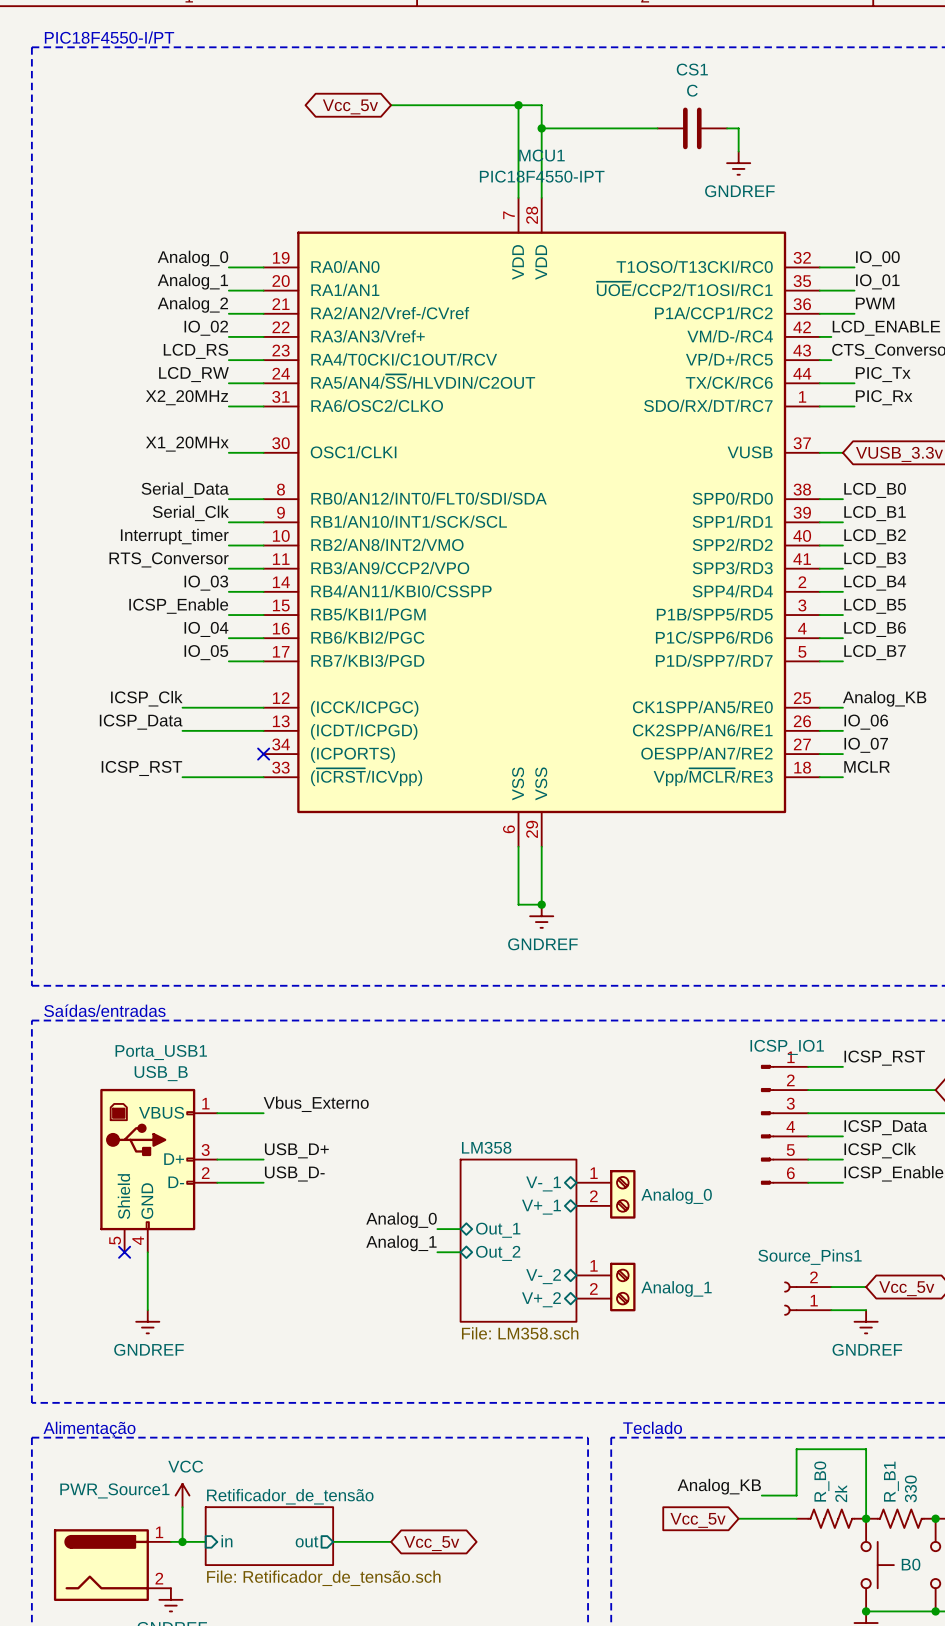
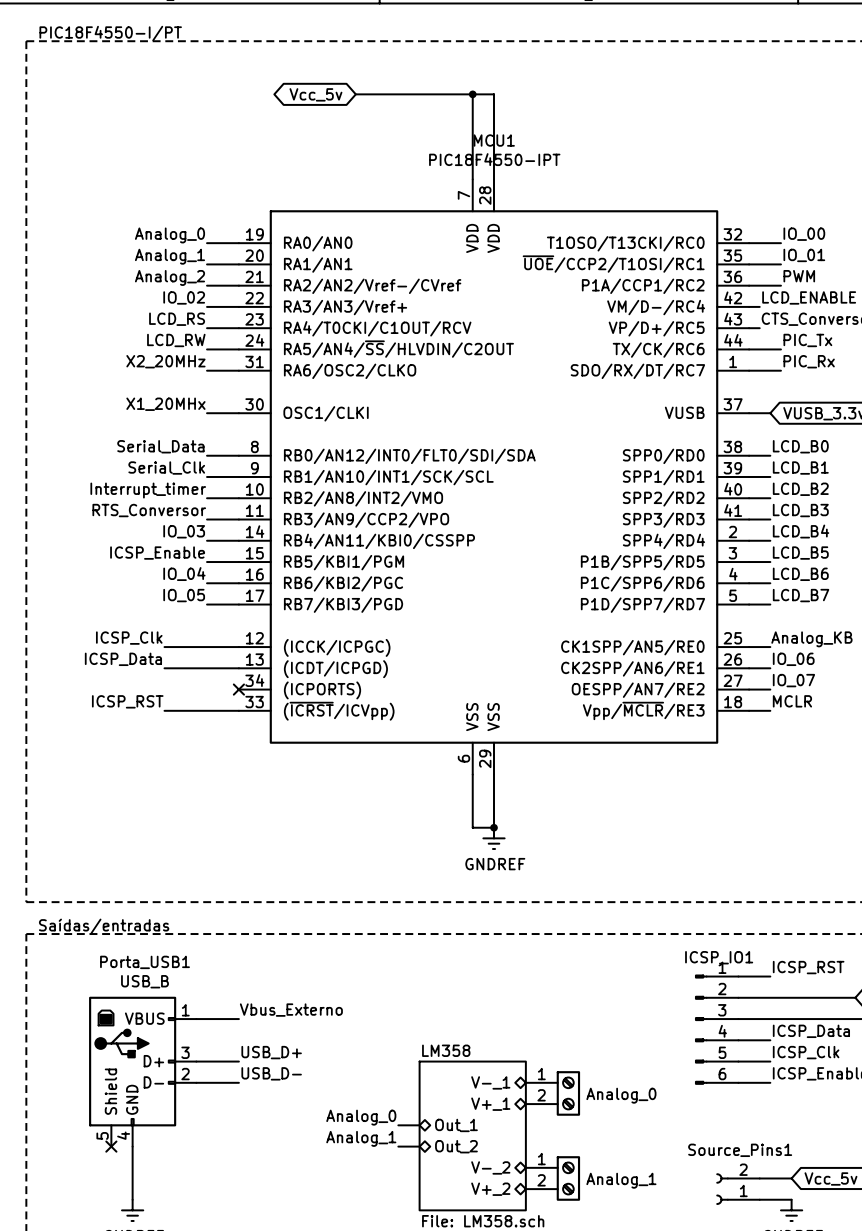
wire: (541, 128) (657, 128) -> none
junction: (541, 128) -> none
CS1: C (692, 128) -> none
wire: (727, 128) (738, 128) (738, 151) -> none
power symbol: GNDREF (738, 163) -> none

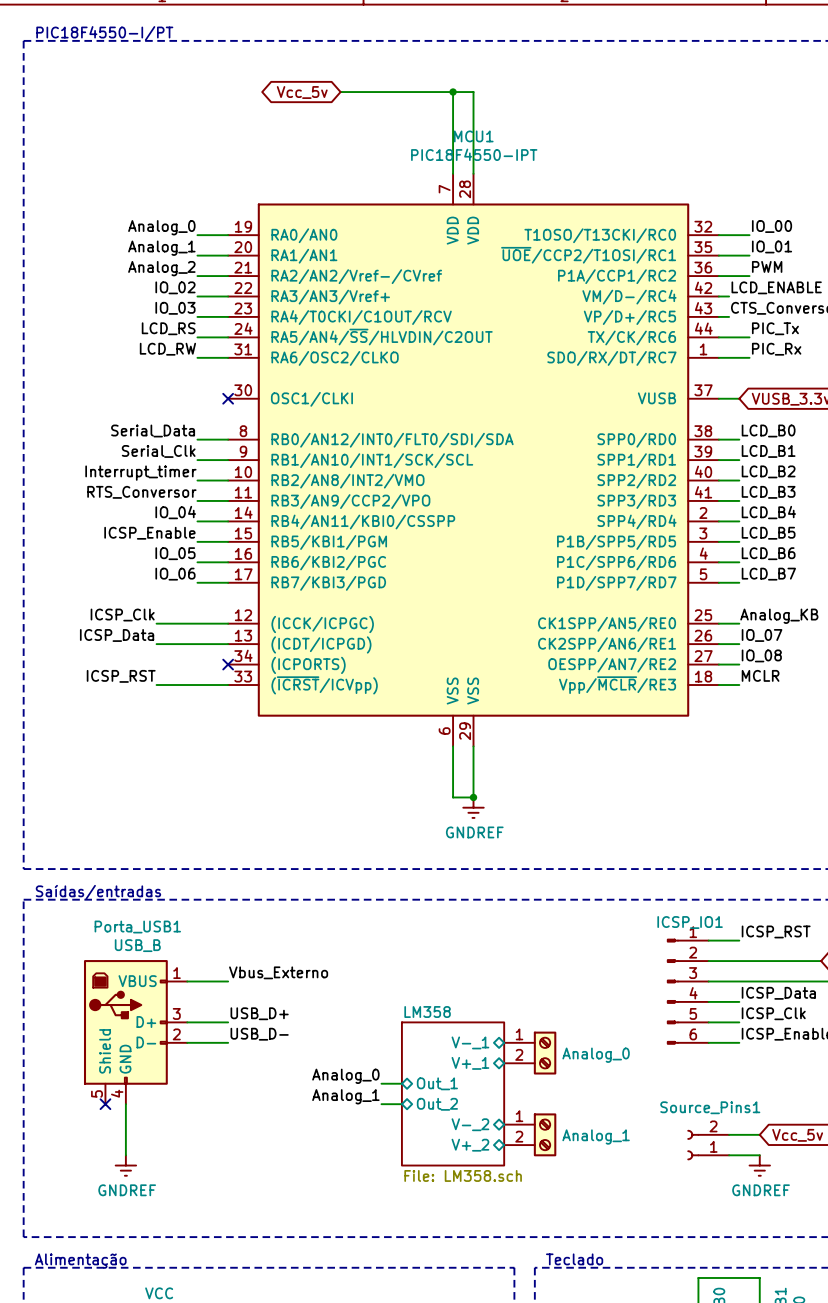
label: LCD_RS (177, 319) -> IO_03 (175, 308)
label: LCD_RW (176, 340) -> LCD_RS (168, 328)
label: X2_20MHz (165, 361) -> LCD_RW (167, 349)
label: X1_20MHx (165, 404) -> none
wire: (207, 413) (238, 413) -> none
no-connect mark: none -> (228, 398)
label: IO_03 (184, 531) -> IO_04 (175, 512)
label: IO_04 (184, 574) -> IO_05 (175, 553)
label: IO_05 (184, 595) -> IO_06 (175, 574)
label: IO_06 (793, 659) -> IO_07 (762, 635)
label: IO_07 (793, 680) -> IO_08 (761, 655)

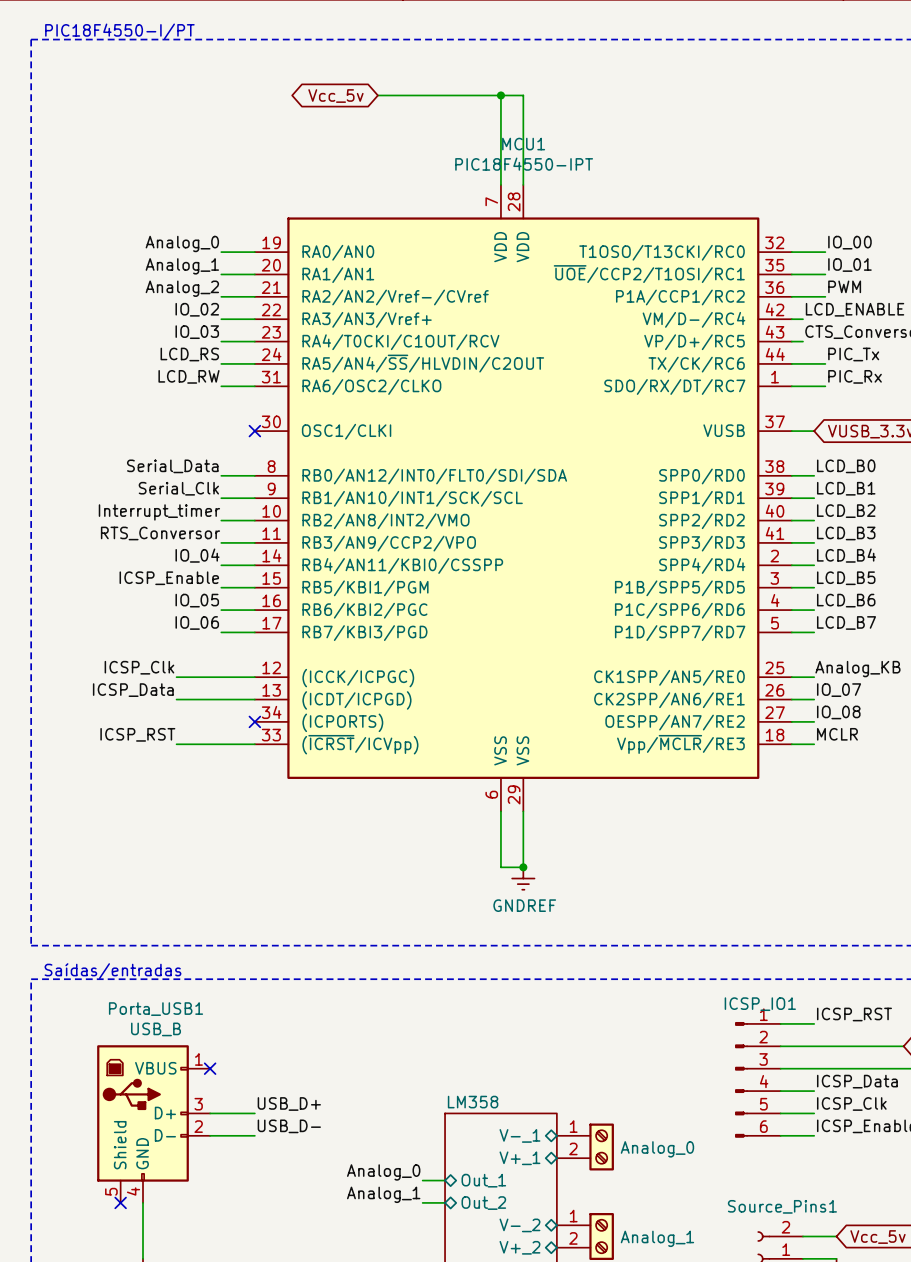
label: Vbus_Externo (278, 972) -> none
wire: (187, 981) (228, 981) -> none
no-connect mark: none -> (210, 1068)

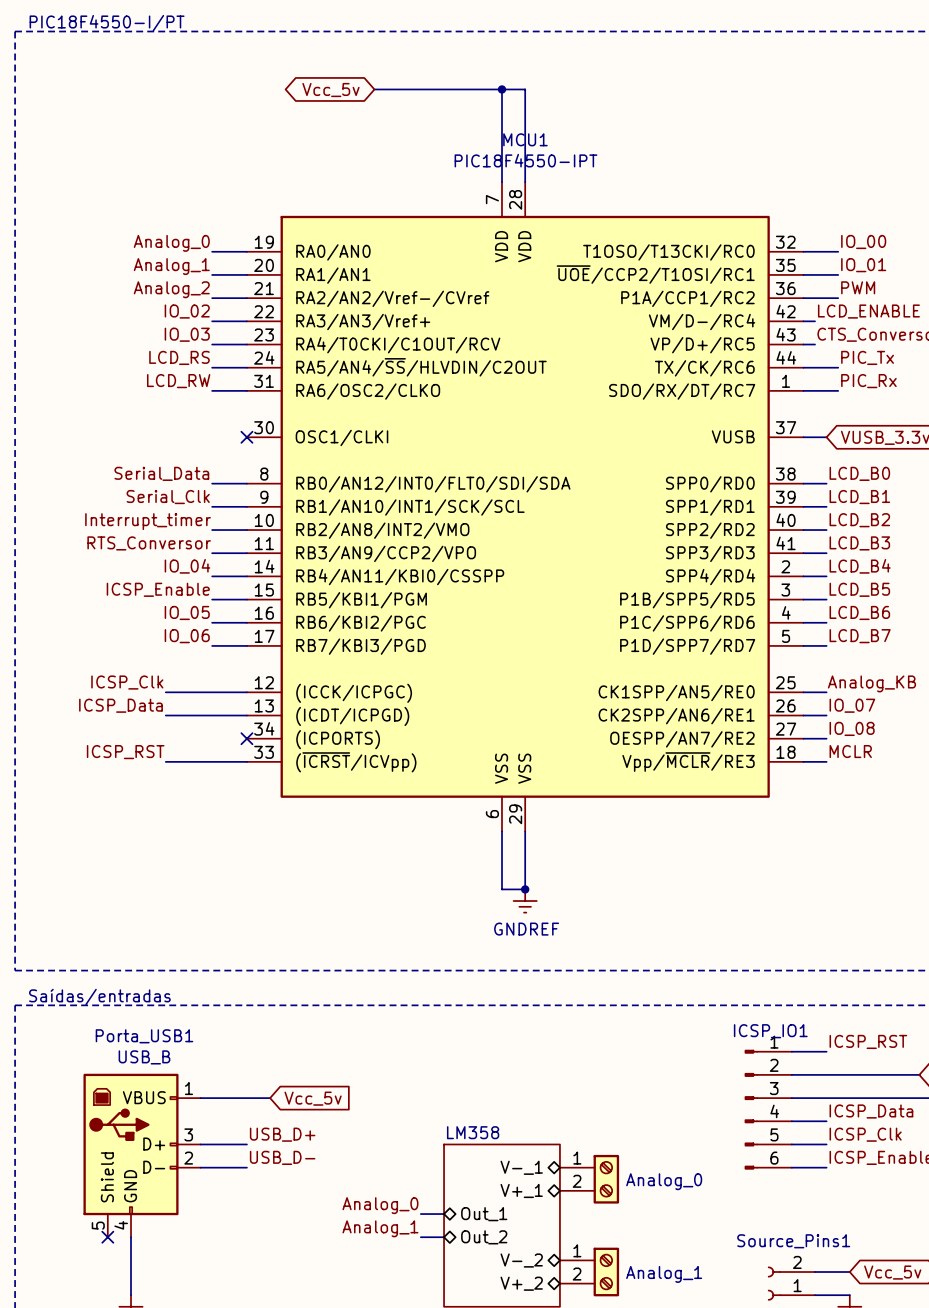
wire: none -> (200, 1098) (270, 1098)
no-connect mark: (210, 1068) -> none
global label: none -> Vcc_5v (313, 1098)

